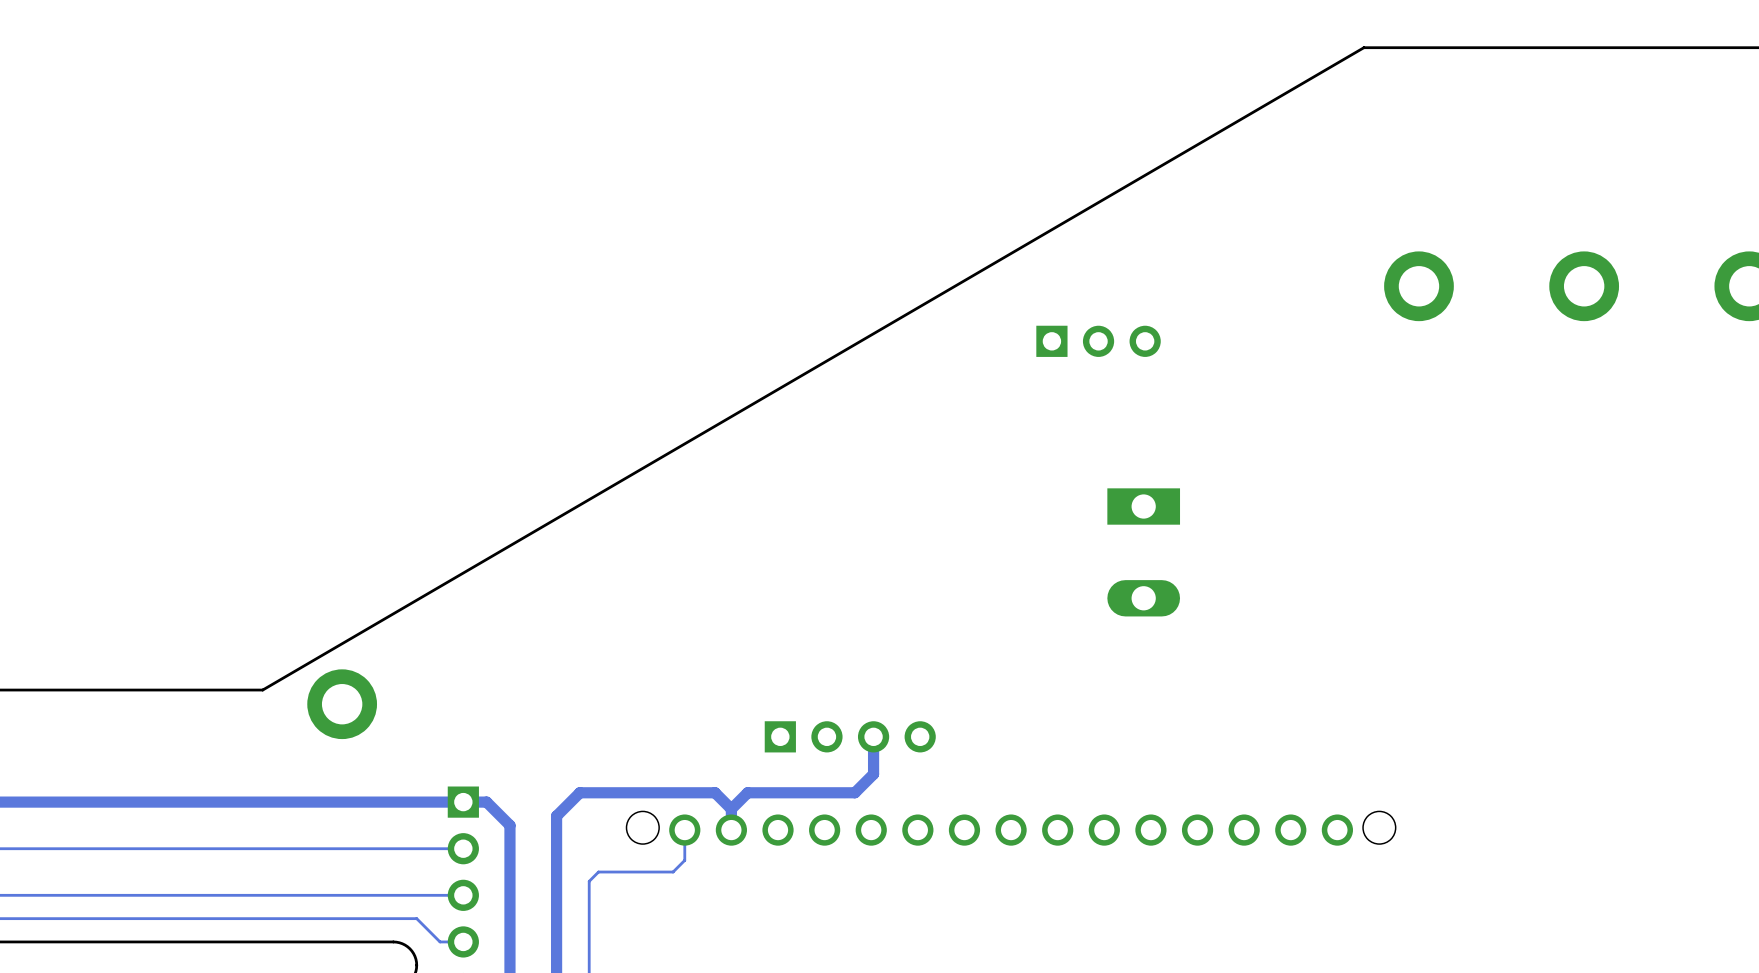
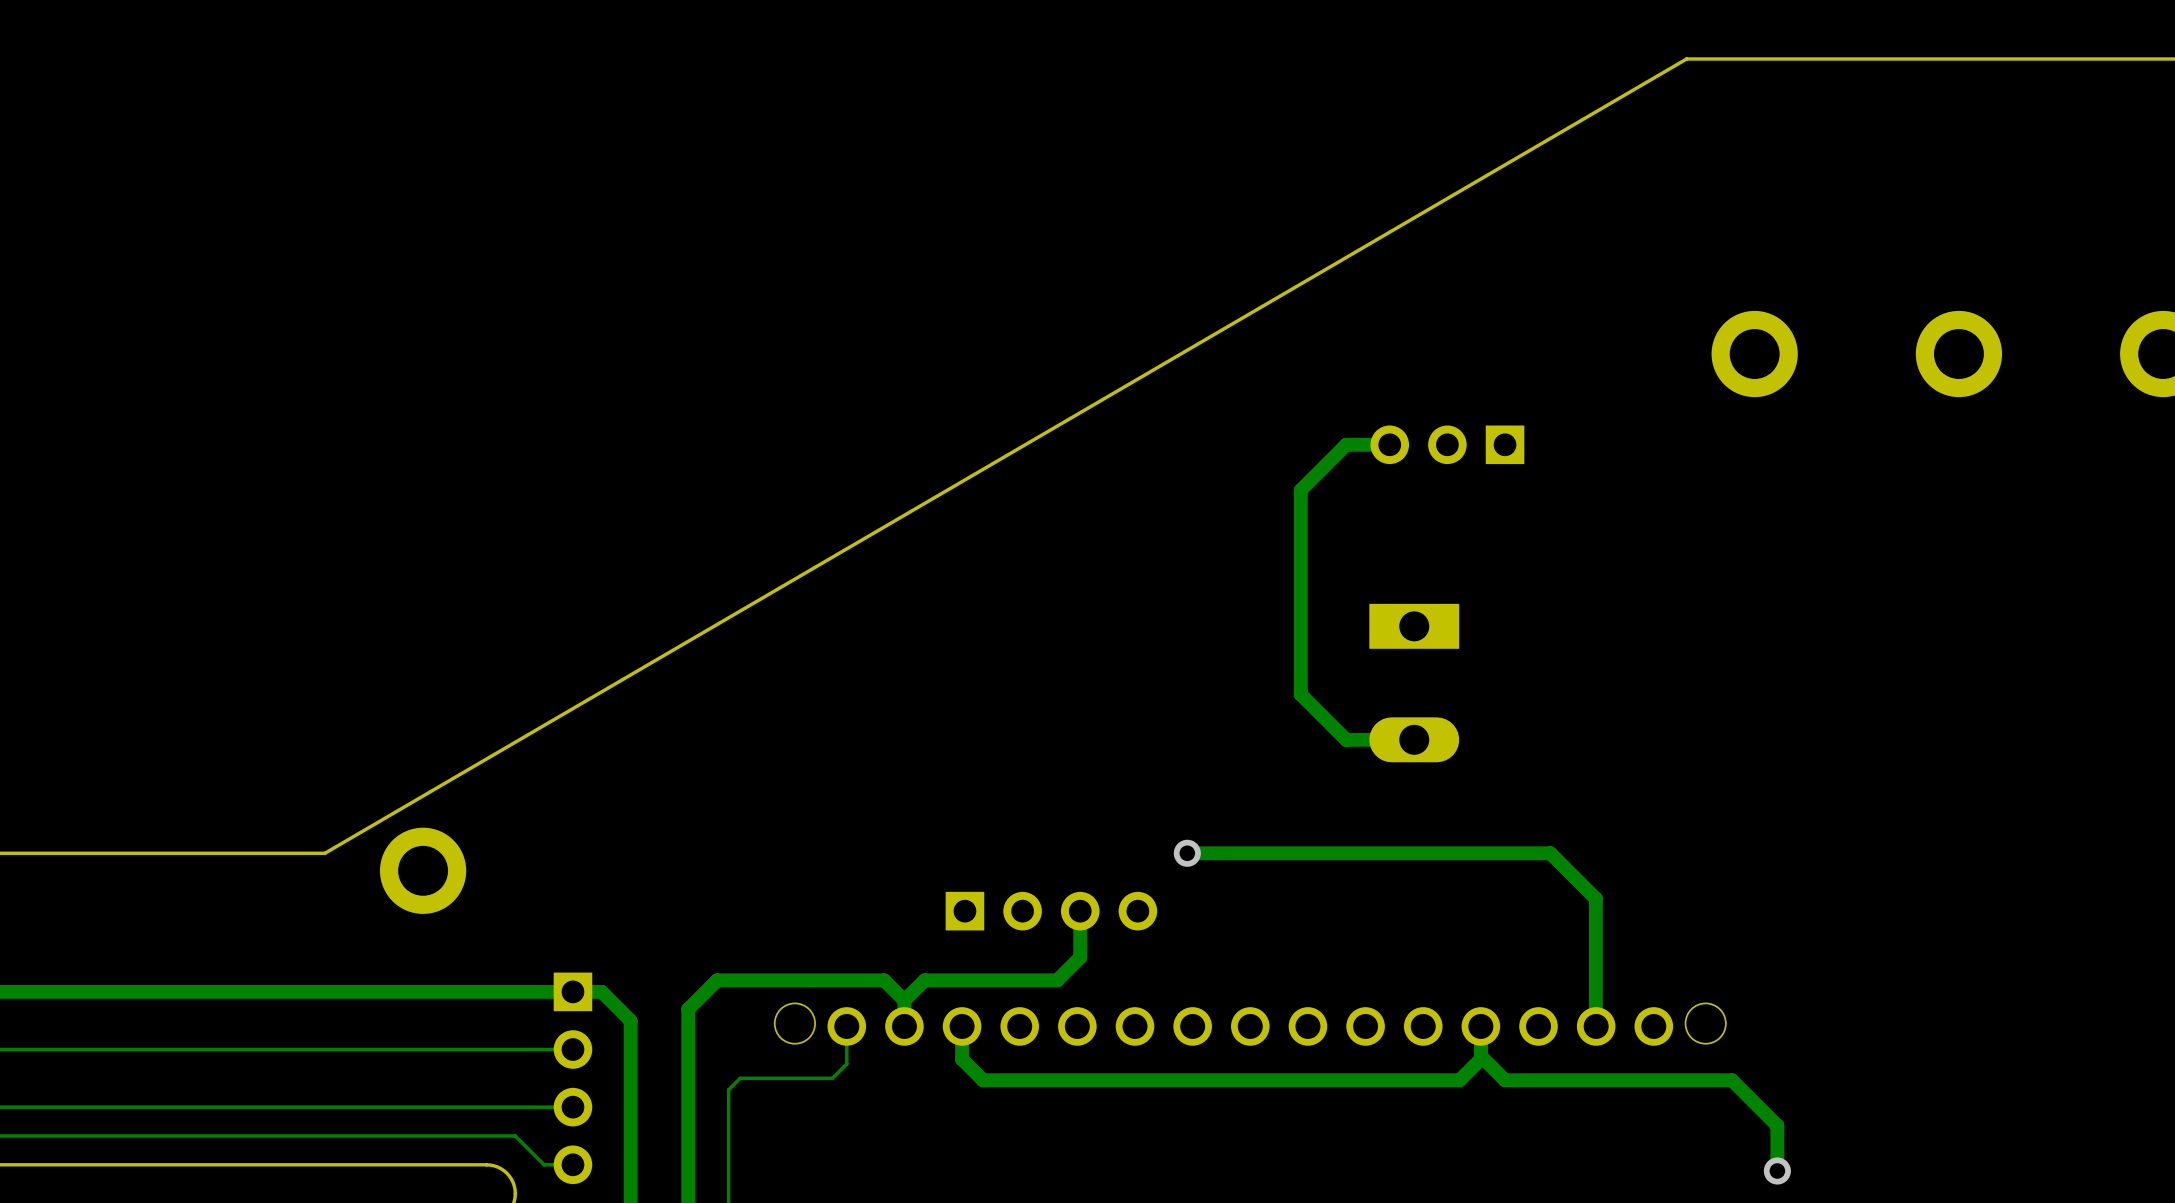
part rotation: 0° (1098, 341) -> 180° (1447, 444)
track: none -> (1389, 444) (1346, 444) (1300, 490) (1300, 694) (1346, 739) (1414, 739)
track: none -> (1187, 853) (1550, 853) (1595, 898) (1596, 1026)
via: none -> (1187, 853)
track: none -> (1480, 1026) (1480, 1059) (1459, 1080) (983, 1080) (962, 1059) (962, 1026)
track: none -> (1480, 1056) (1505, 1080) (1731, 1080) (1777, 1125) (1777, 1171)
via: none -> (1777, 1171)

